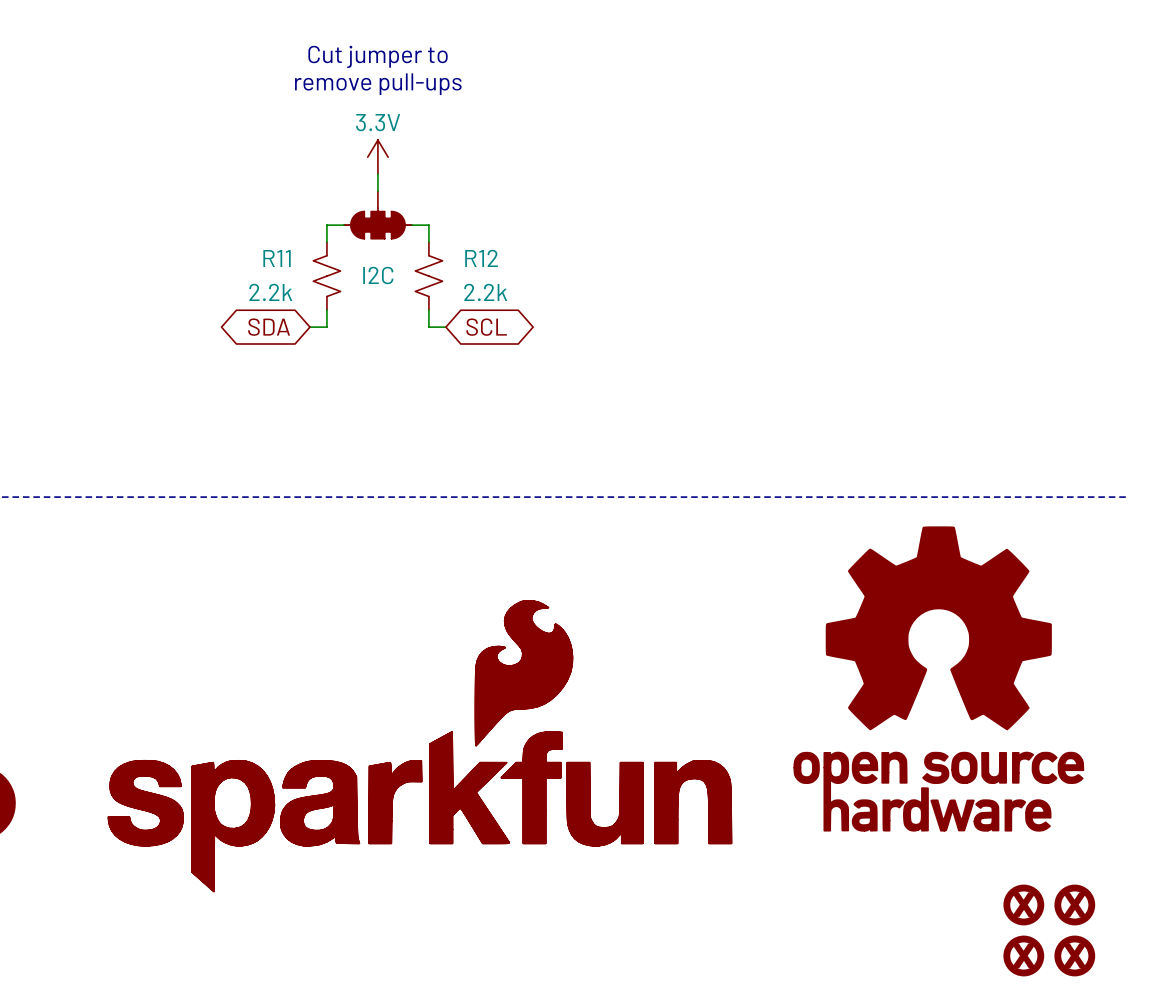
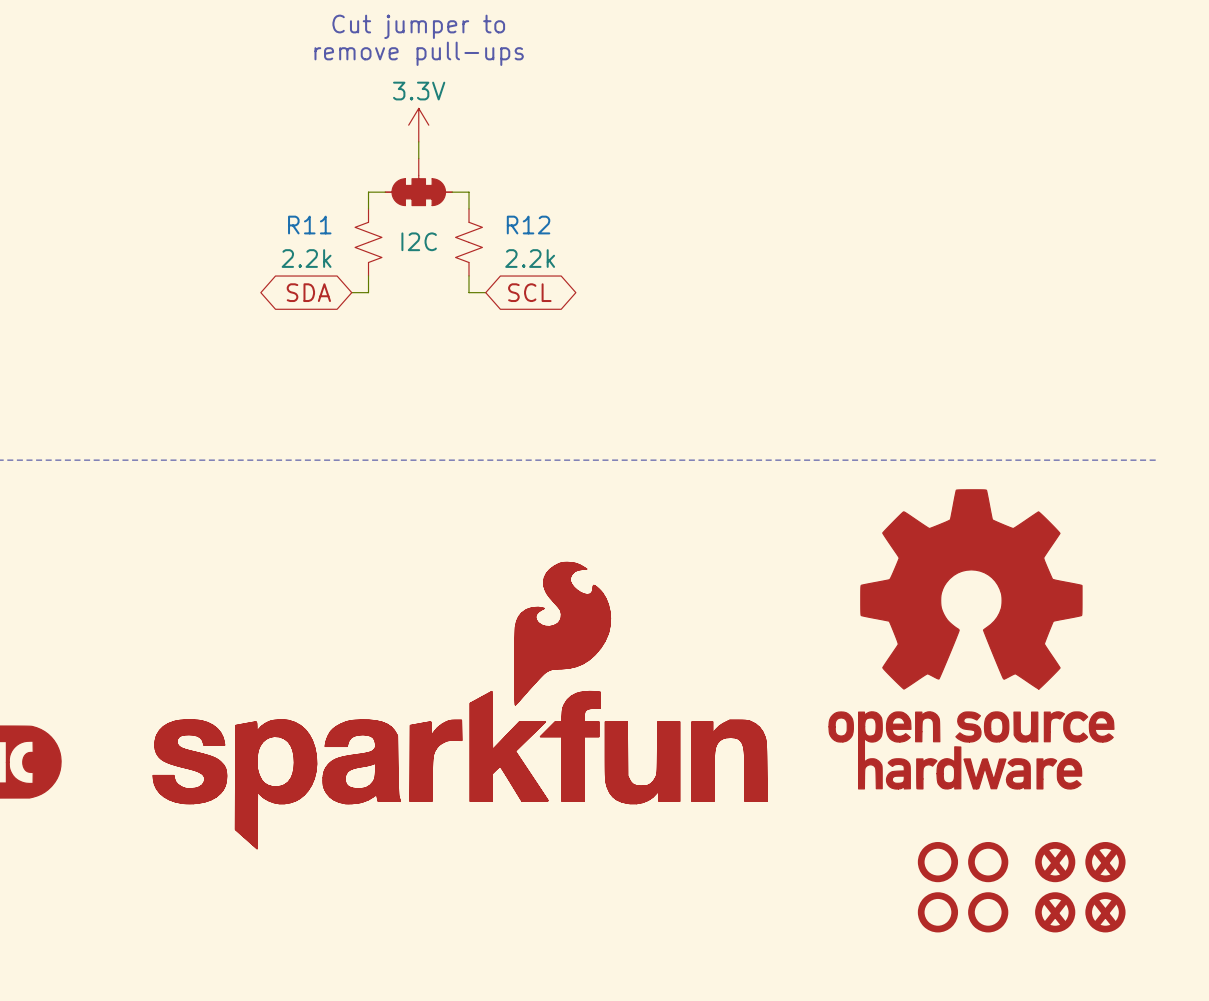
part: none -> (937, 862)
part: none -> (988, 862)
part: none -> (937, 912)
part: none -> (988, 912)

